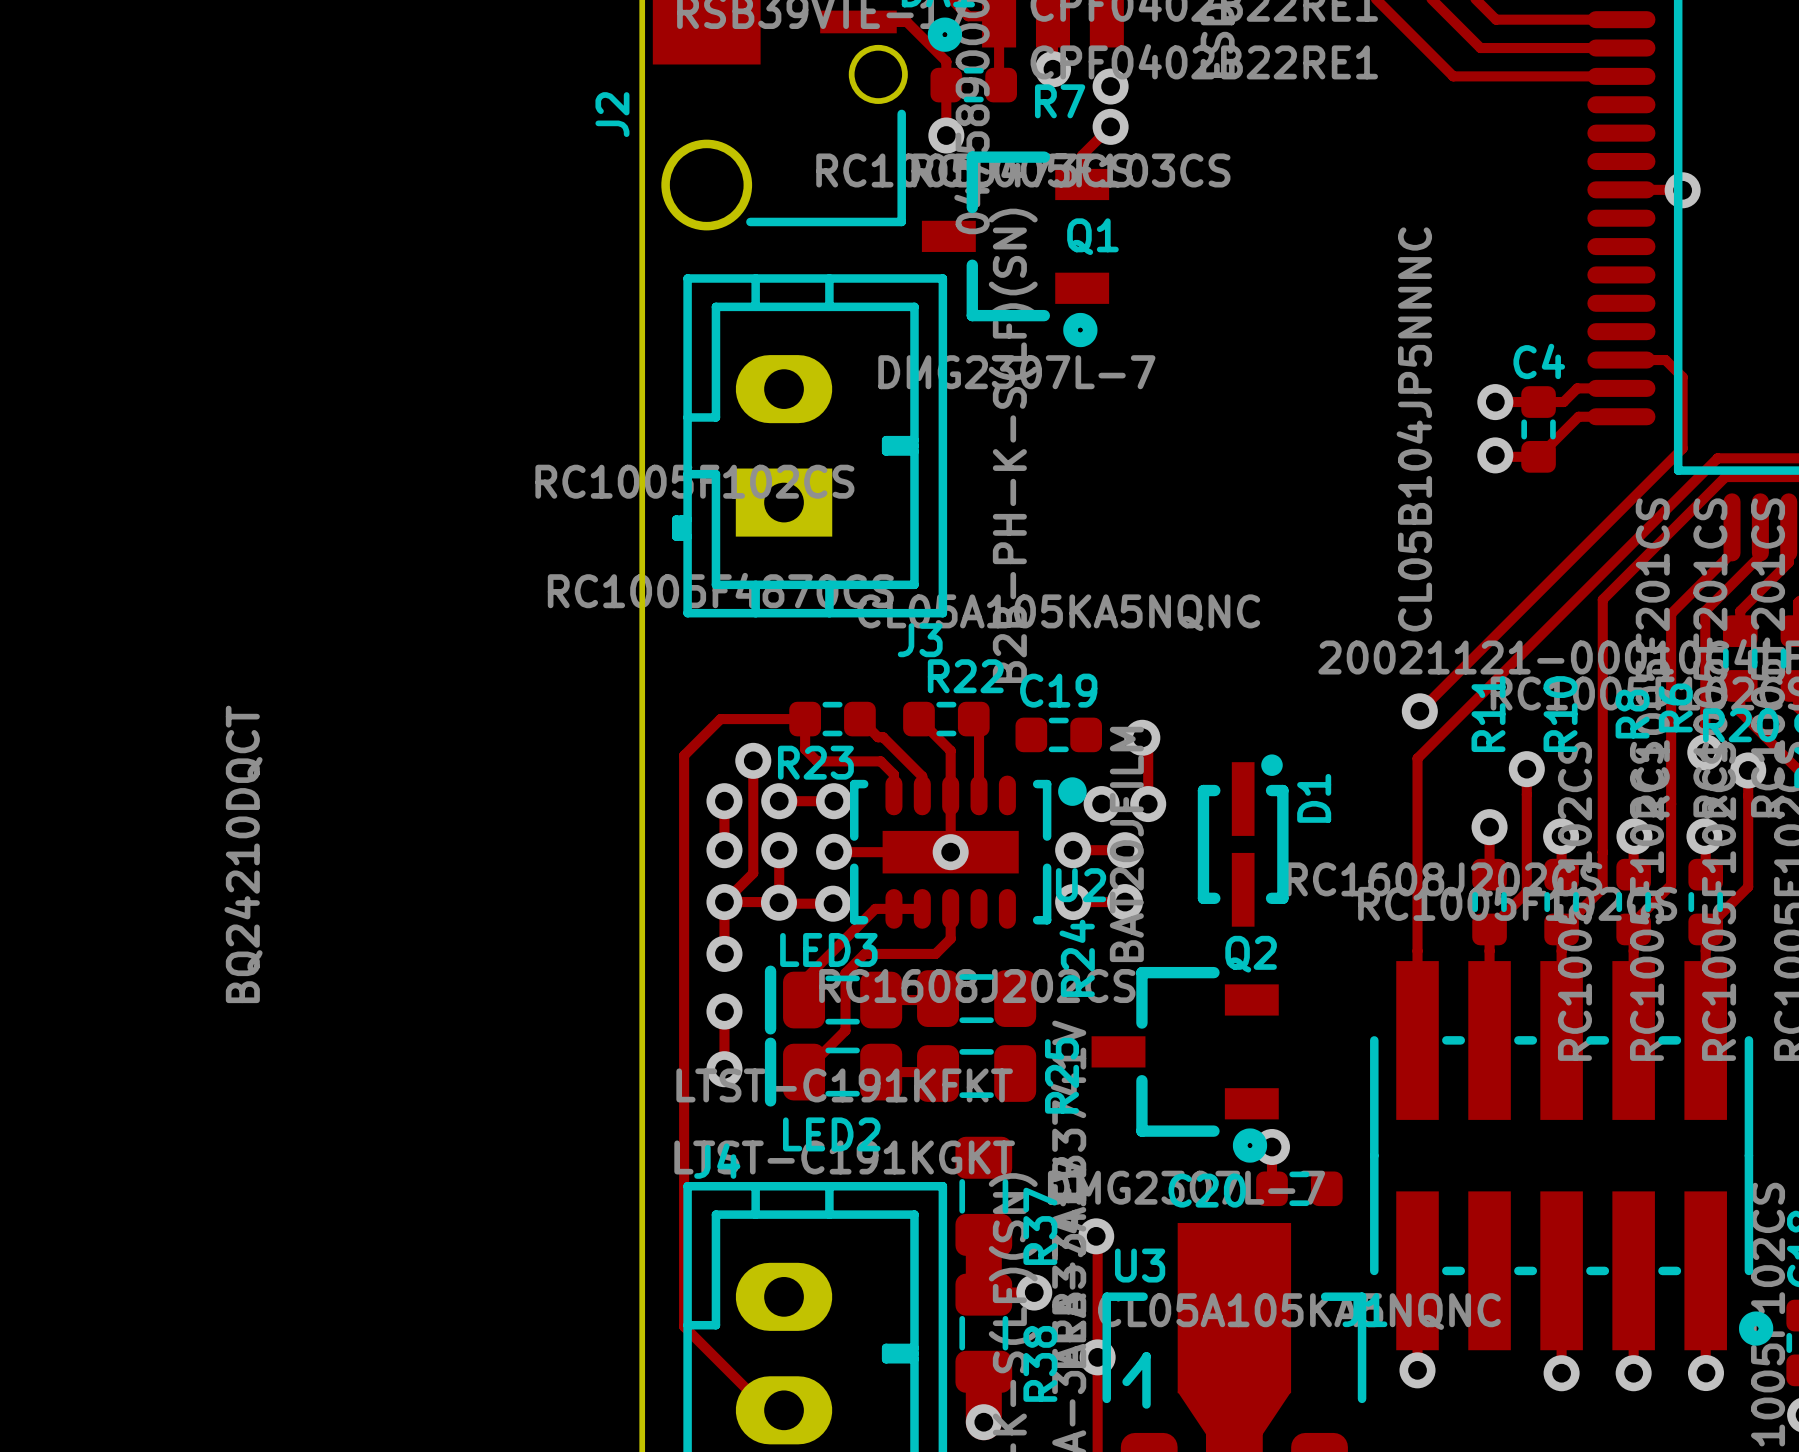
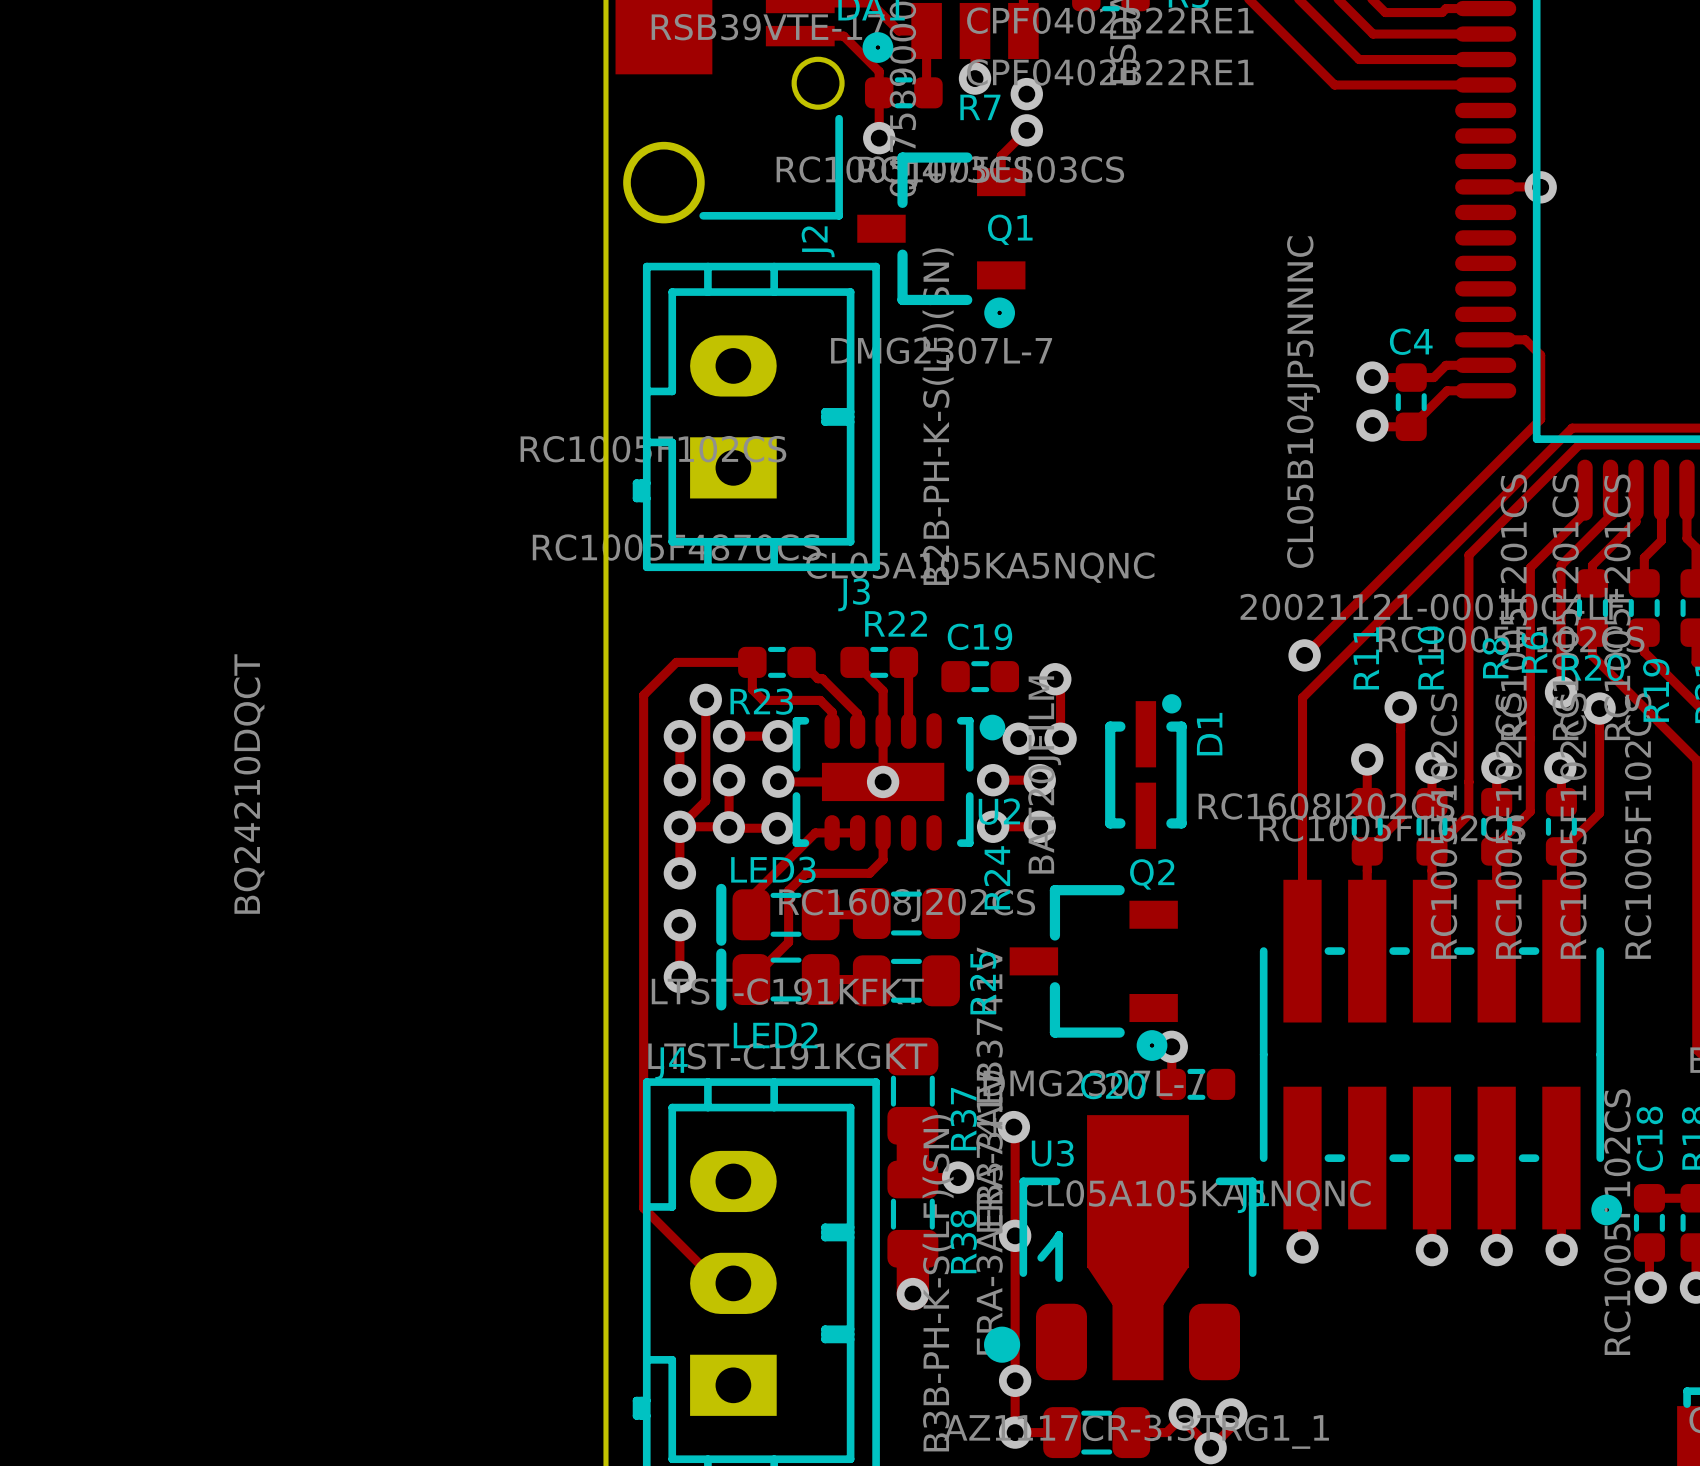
J2 name position: J2 (612, 114) -> J2 (818, 241)

